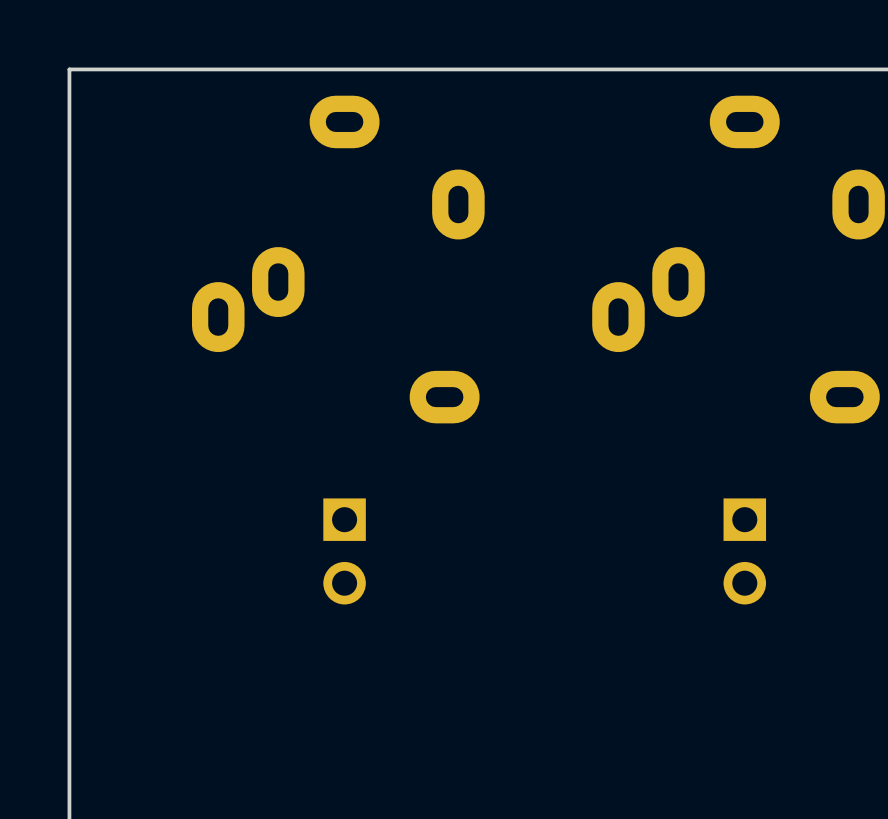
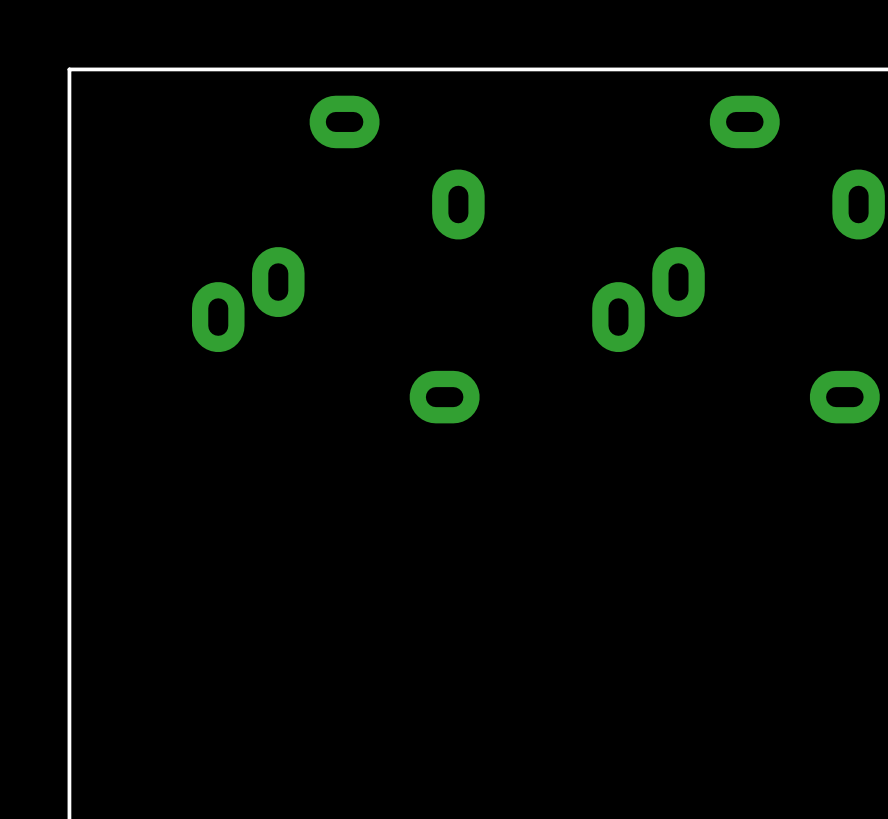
part: (344, 551) -> none
part: (744, 551) -> none

